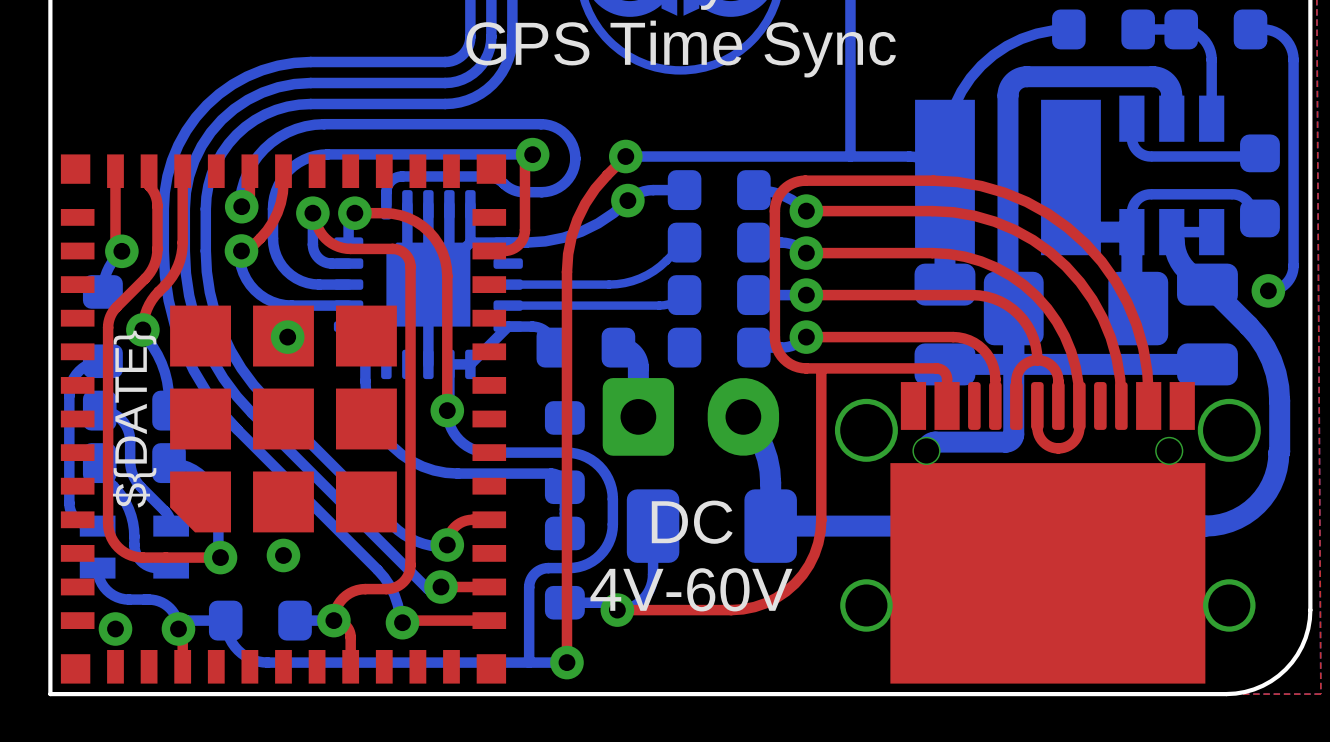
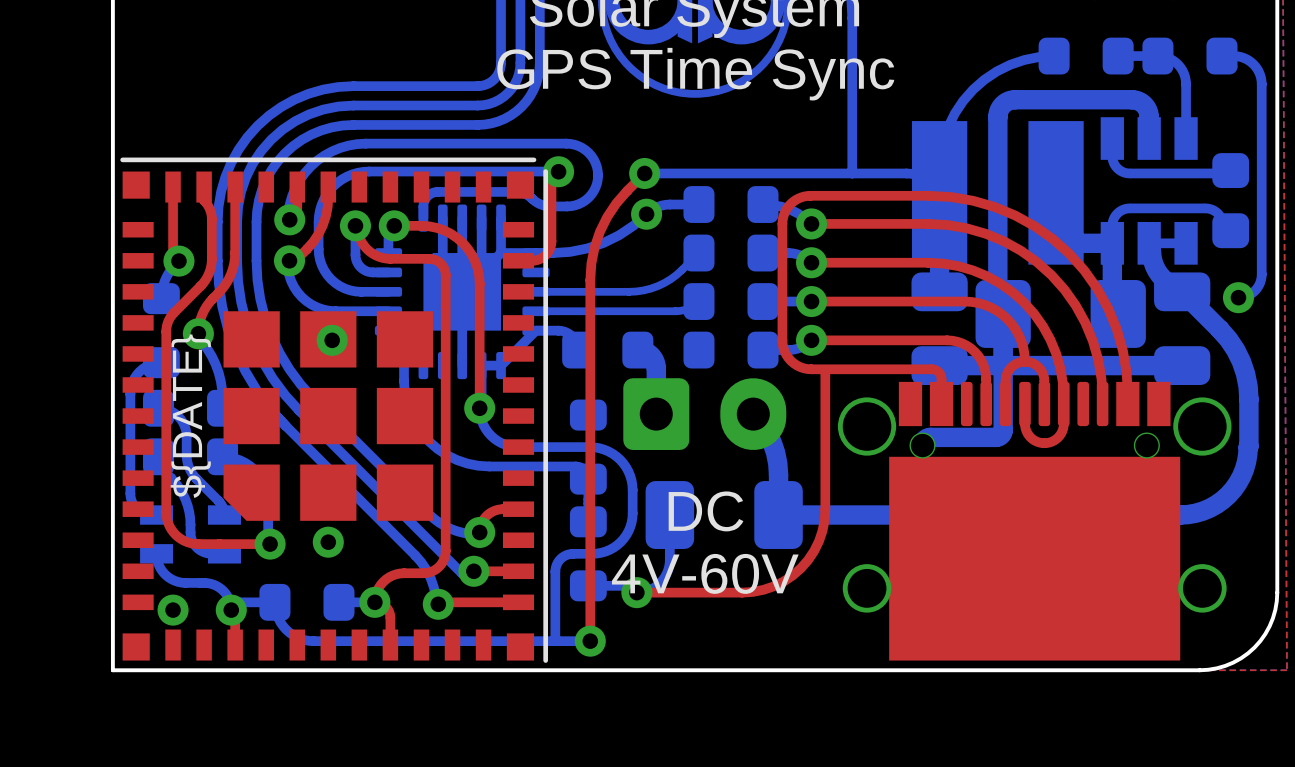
part footprint: [60, 154, 507, 684] -> [120, 157, 548, 663]

